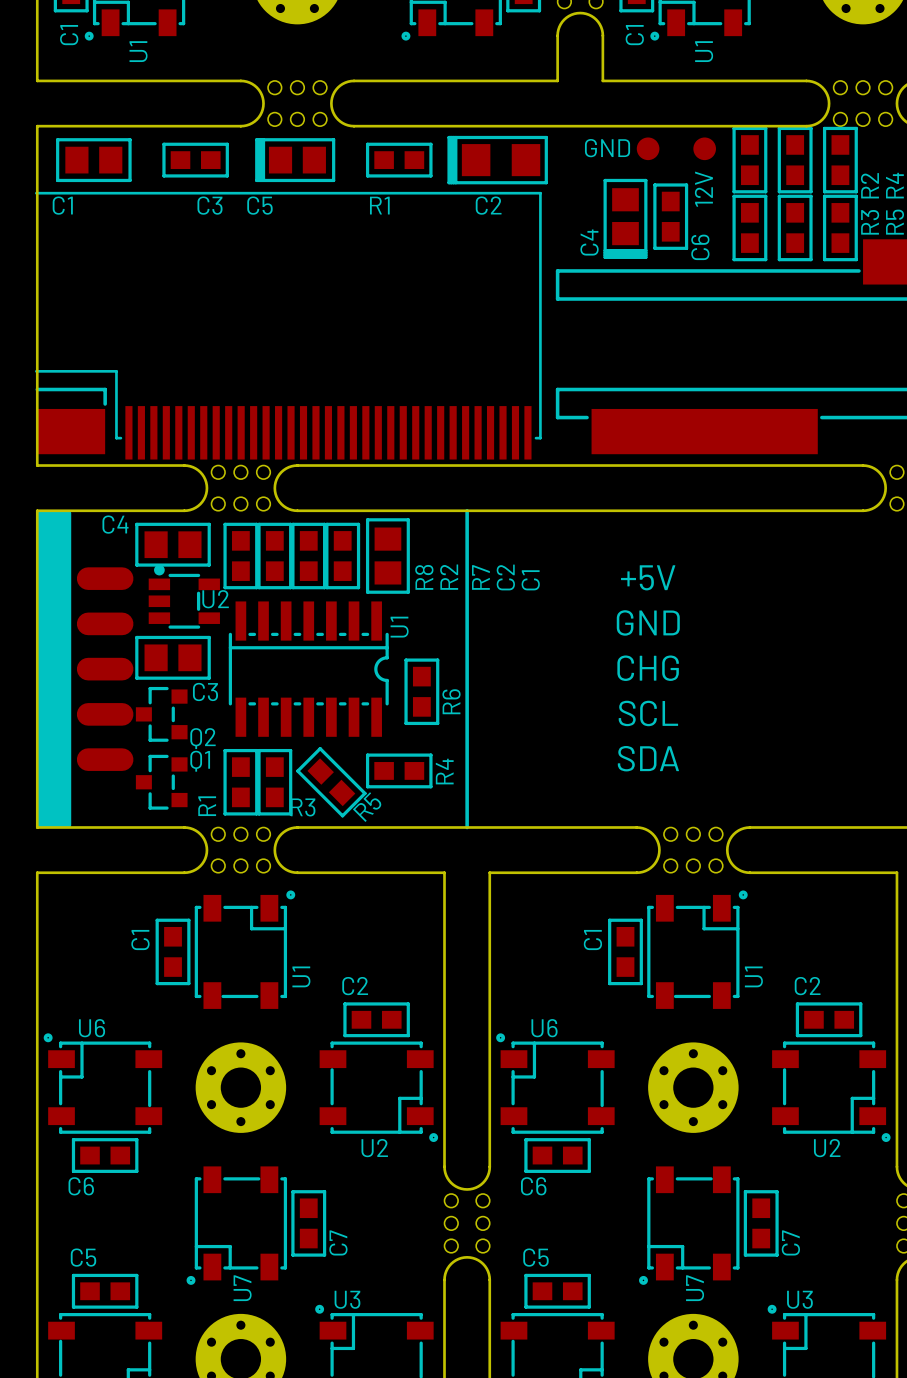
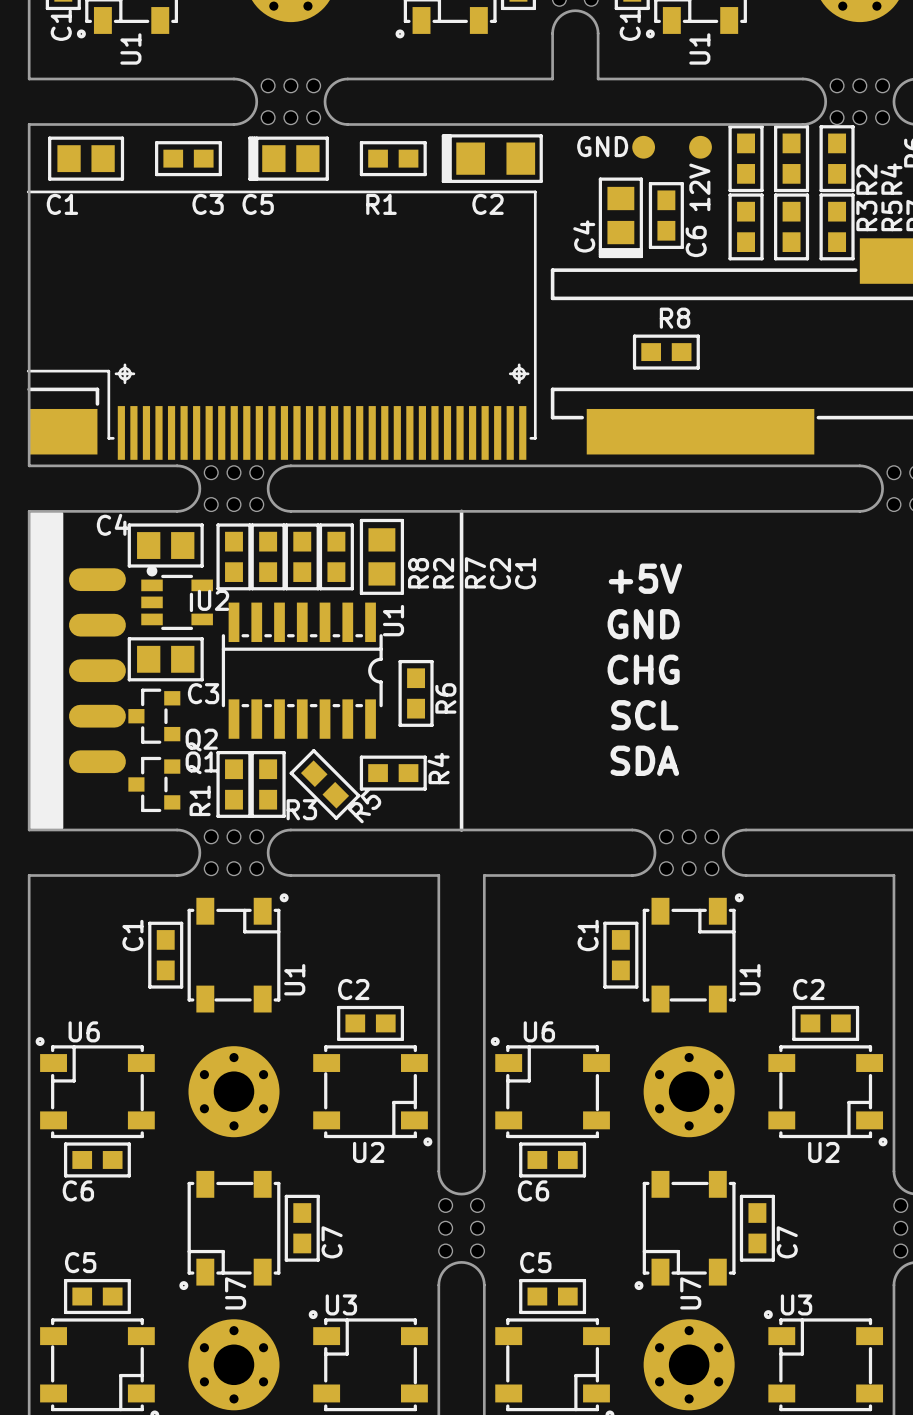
part footprint: [34, 191, 542, 460] -> [26, 190, 537, 460]
R8: none -> (666, 352)

